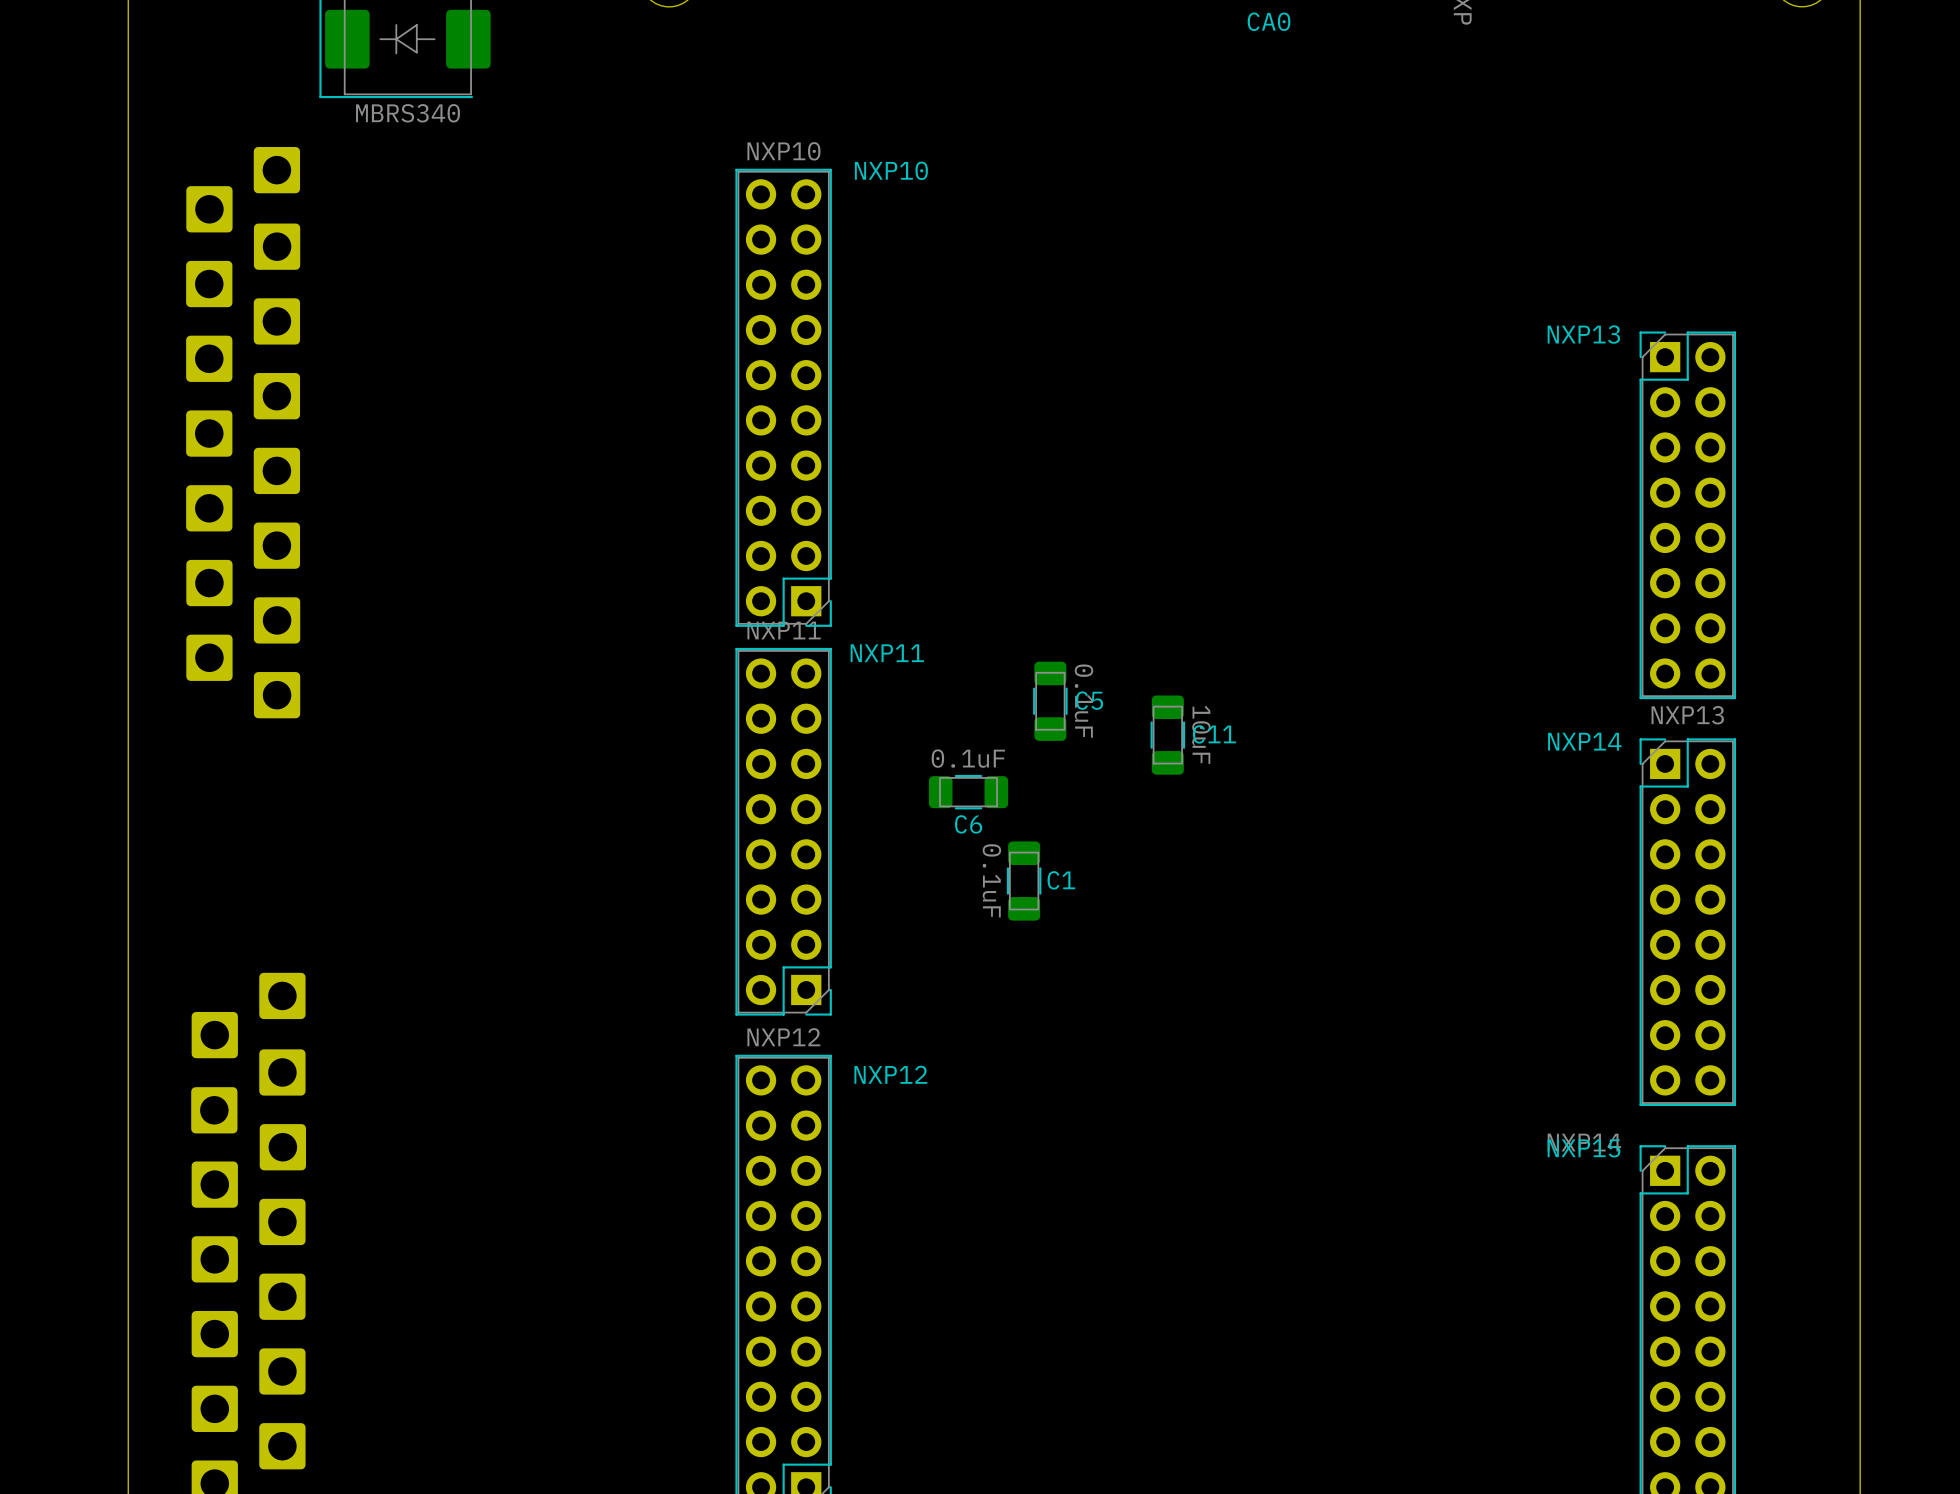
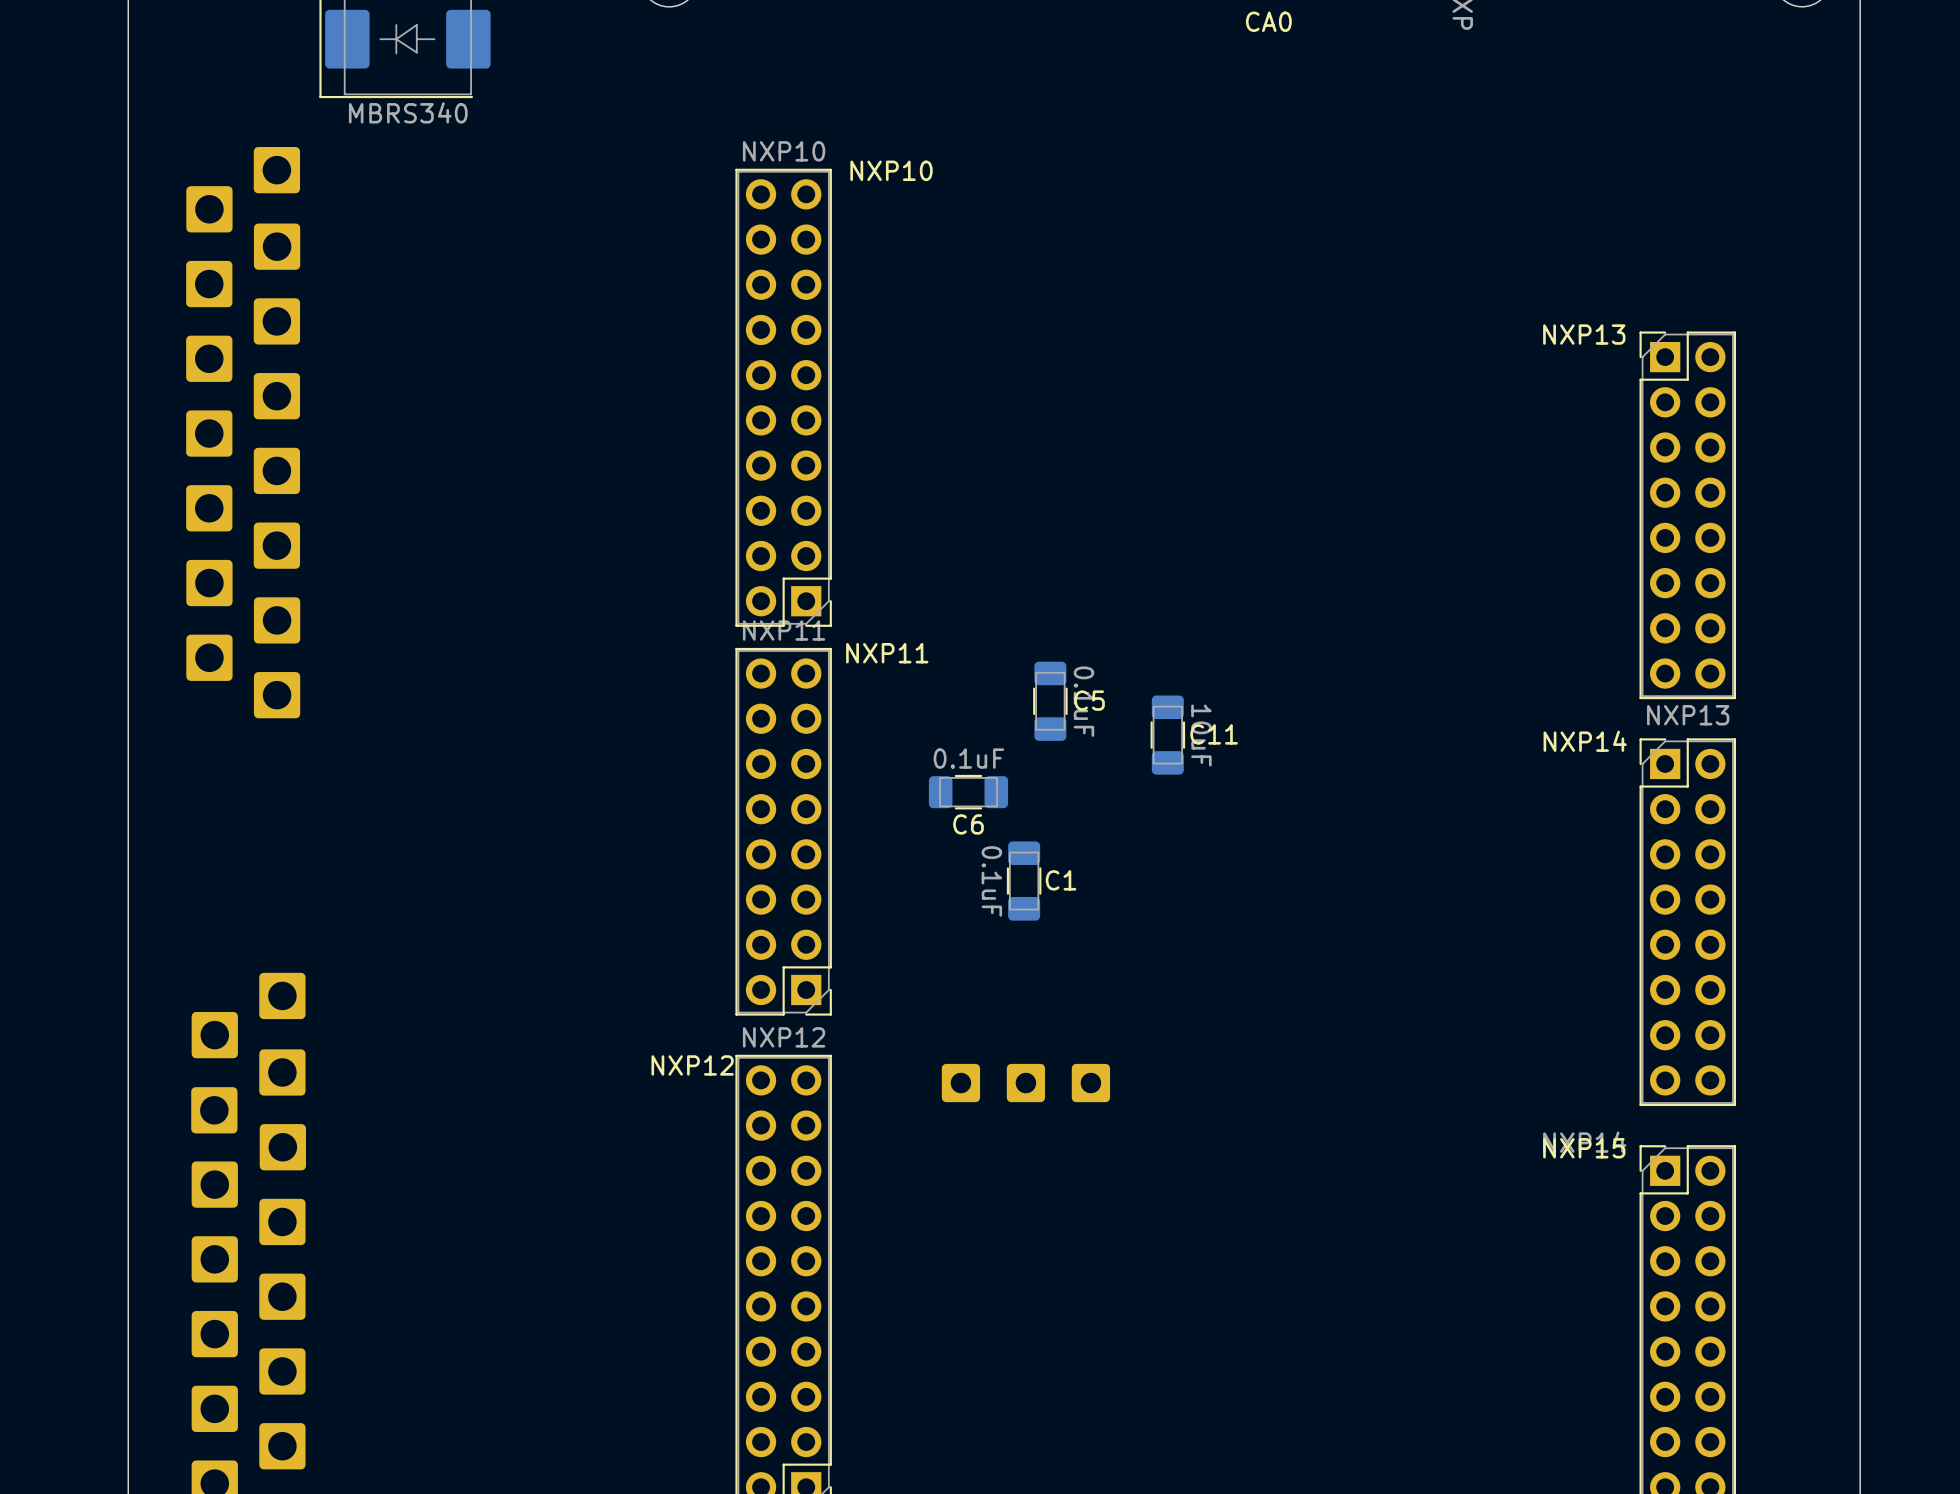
NXP12 name position: NXP12 (890, 1074) -> NXP12 (692, 1065)
part: none -> (960, 1083)
part: none -> (1025, 1083)
part: none -> (1090, 1083)

